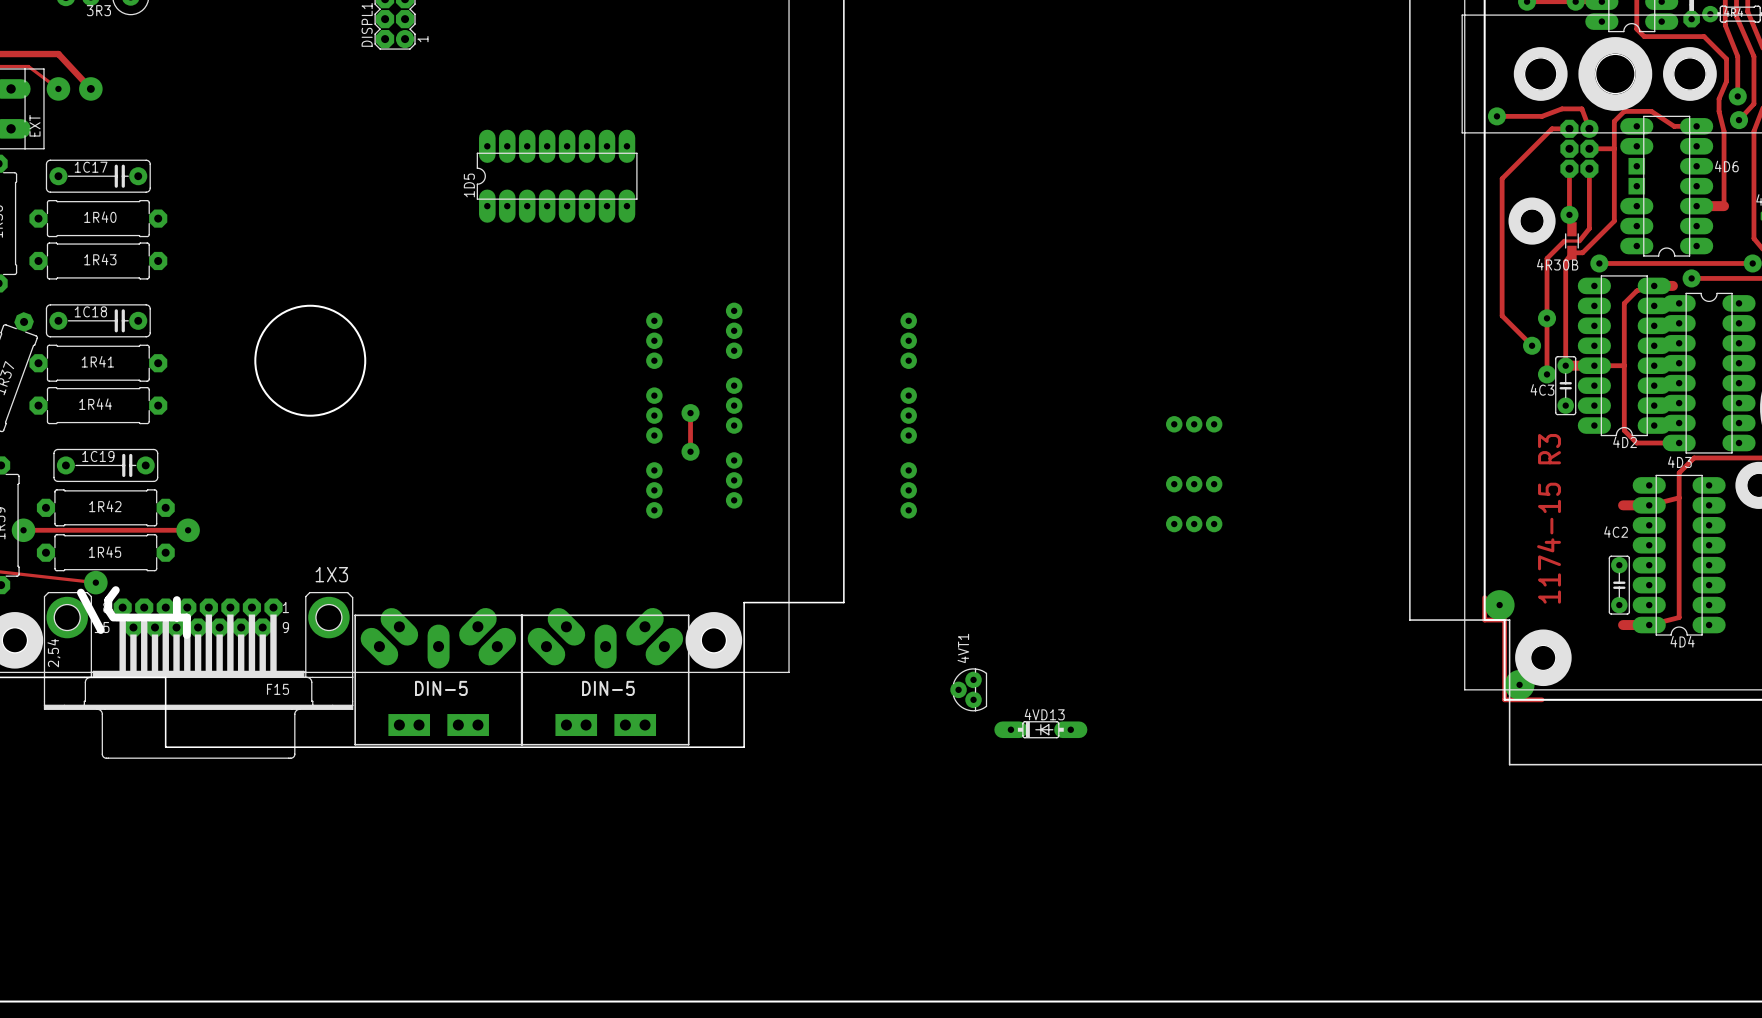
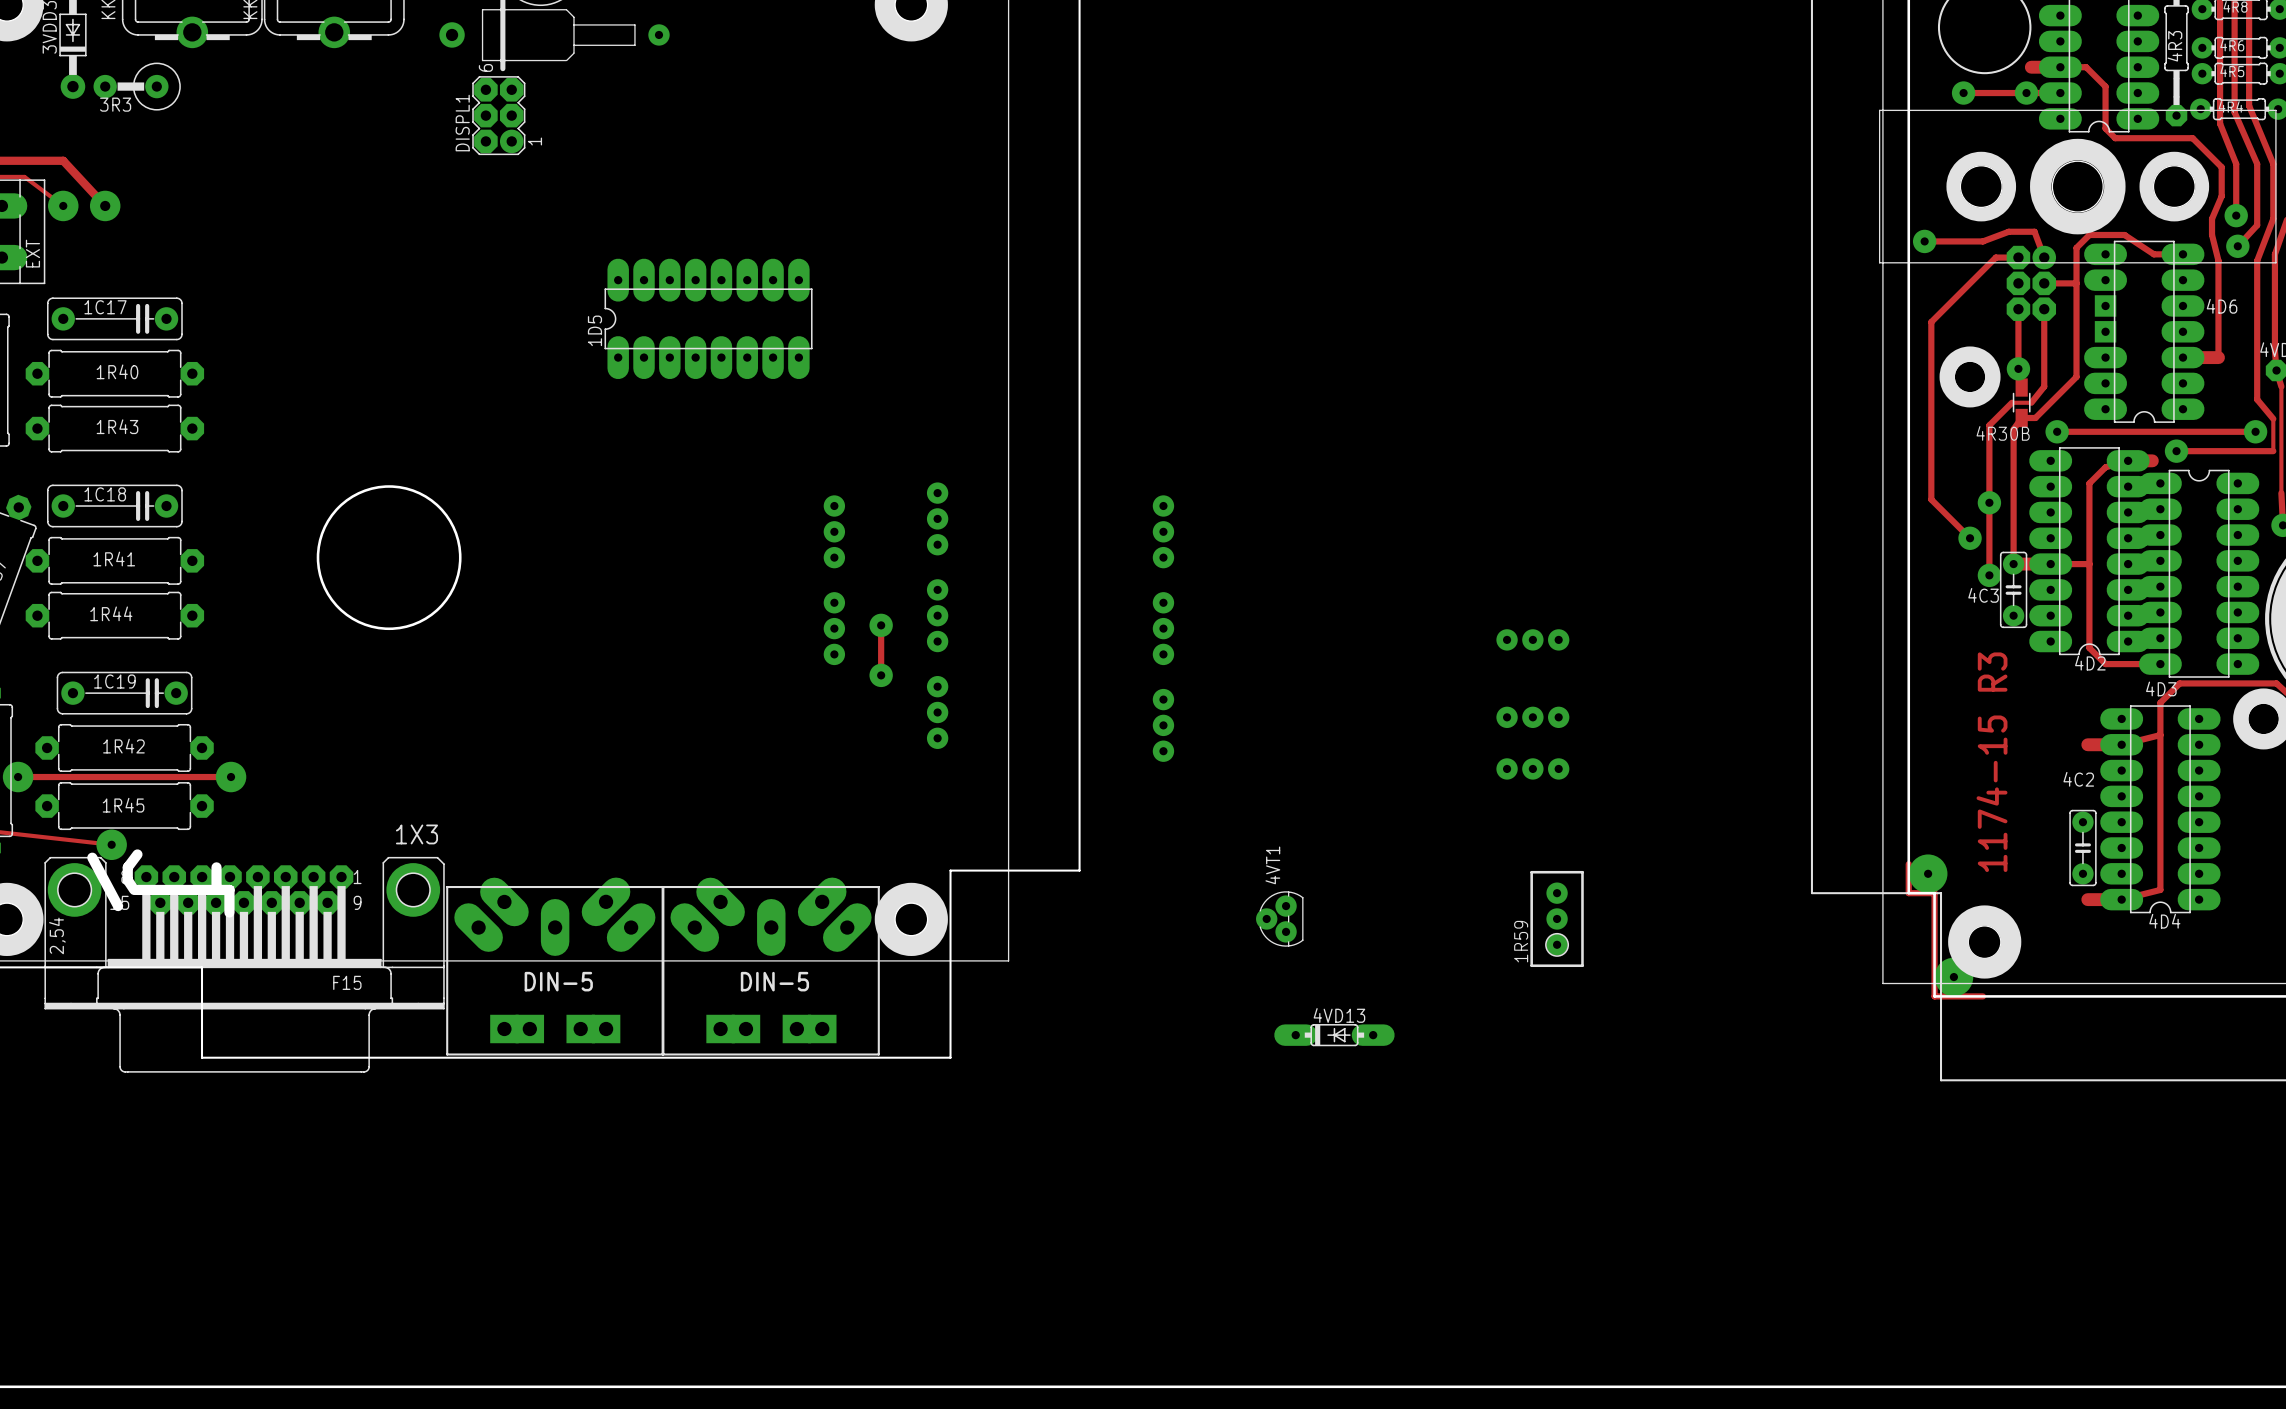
part: (654, 490) -> none
1R59: none -> (1557, 918)
4VT1 position: (968, 689) -> (1279, 919)

